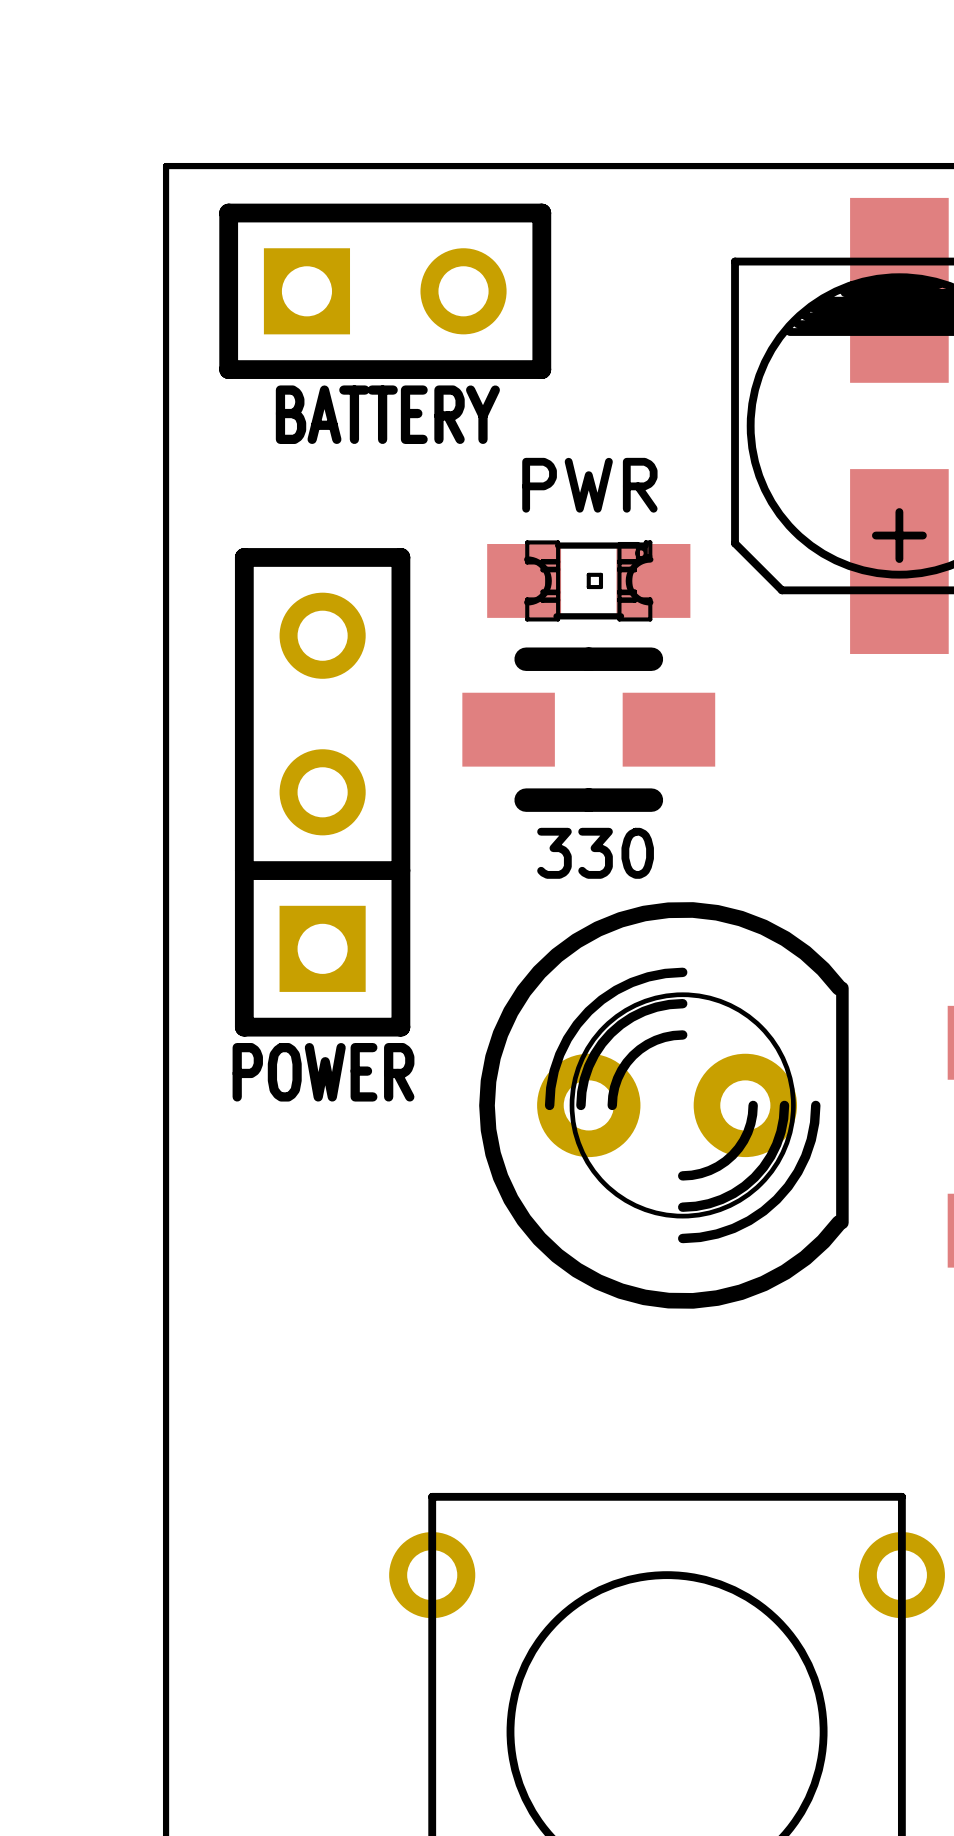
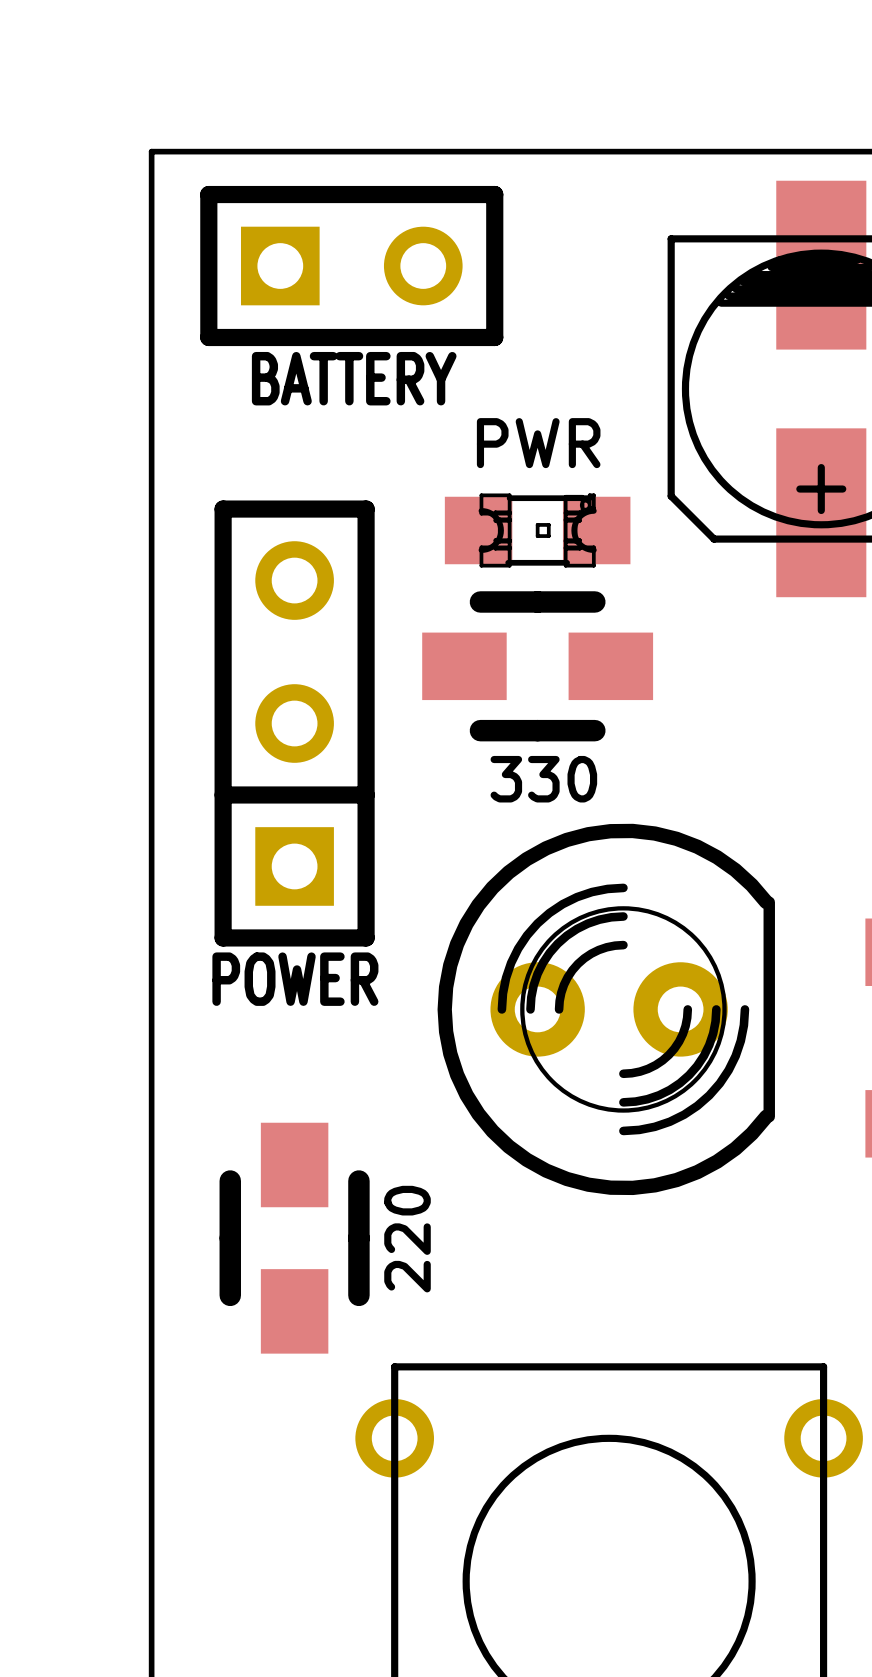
part: none -> 220 (294, 1238)

